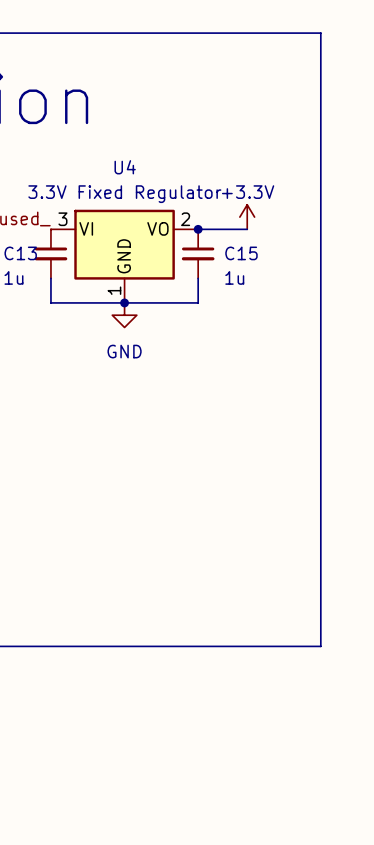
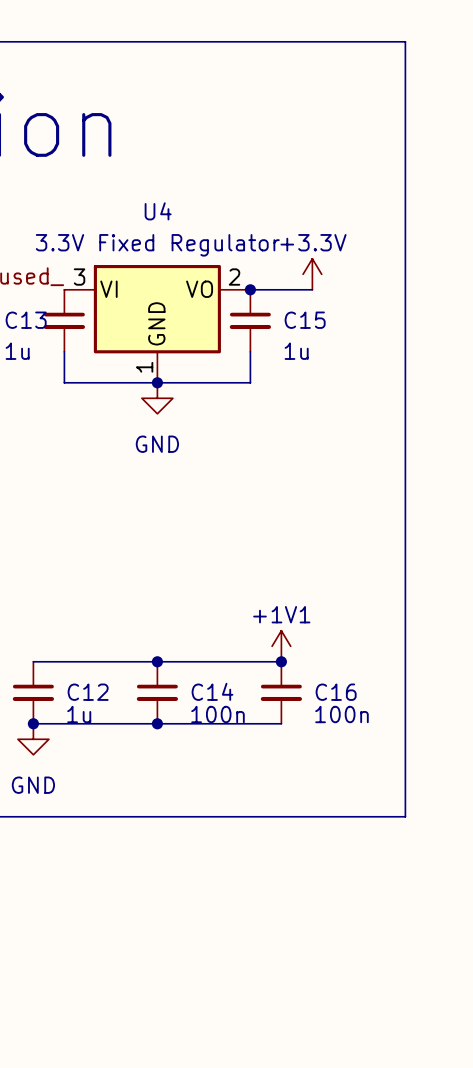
power symbol: none -> +1V1 (281, 646)
wire: none -> (33, 661) (281, 661)
junction: none -> (157, 661)
junction: none -> (281, 661)
C12: none -> 1u (33, 692)
C14: none -> 100n (157, 692)
C16: none -> 100n (281, 692)
wire: none -> (33, 723) (281, 723)
junction: none -> (33, 723)
junction: none -> (157, 723)
power symbol: none -> GND (33, 739)

